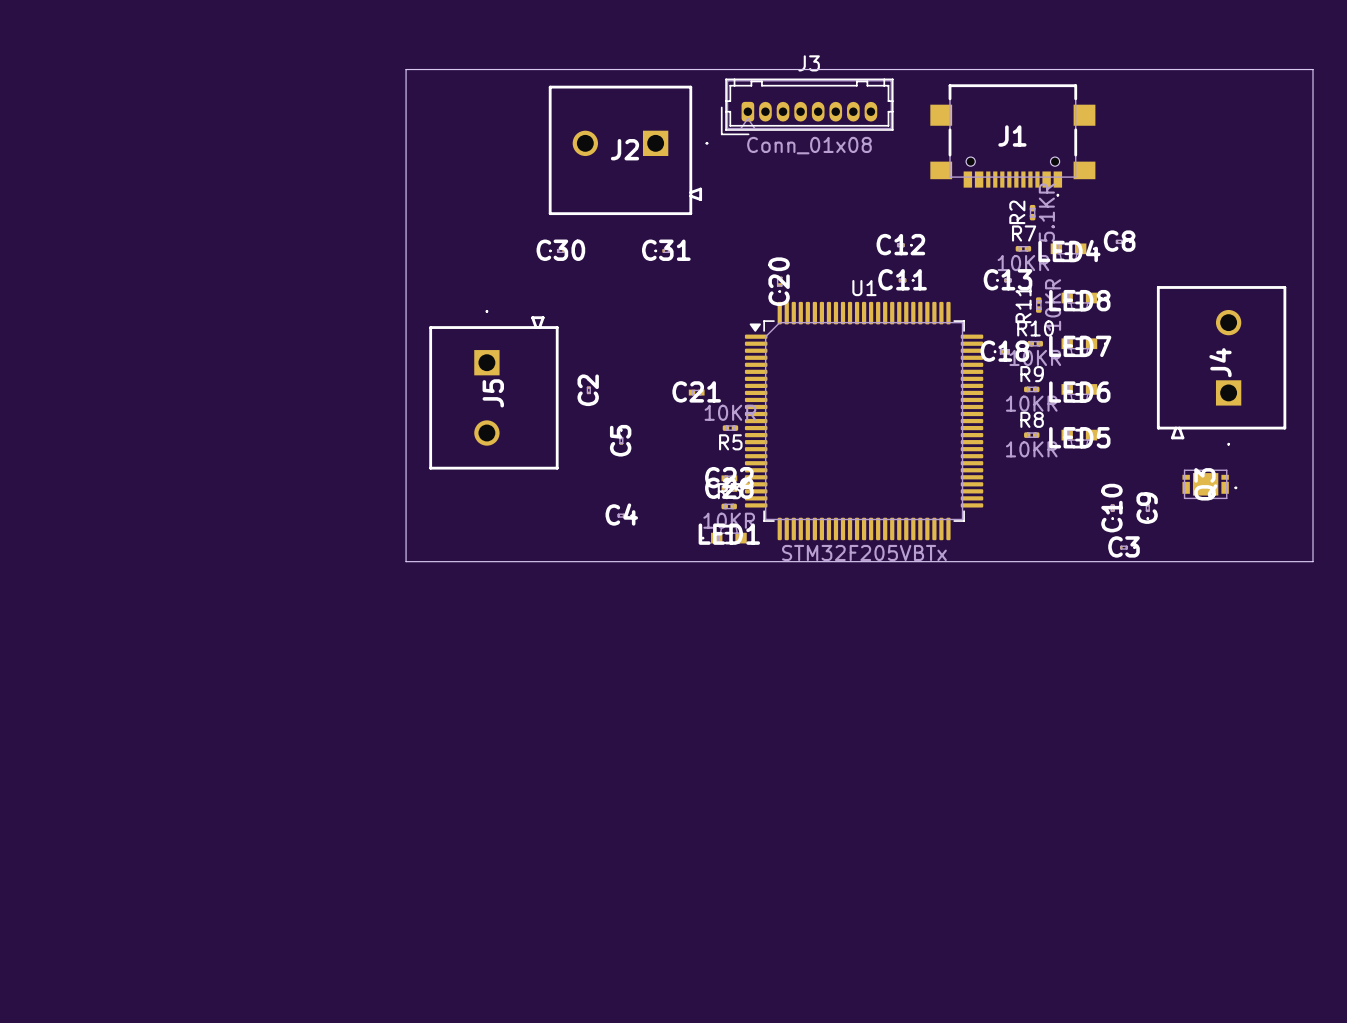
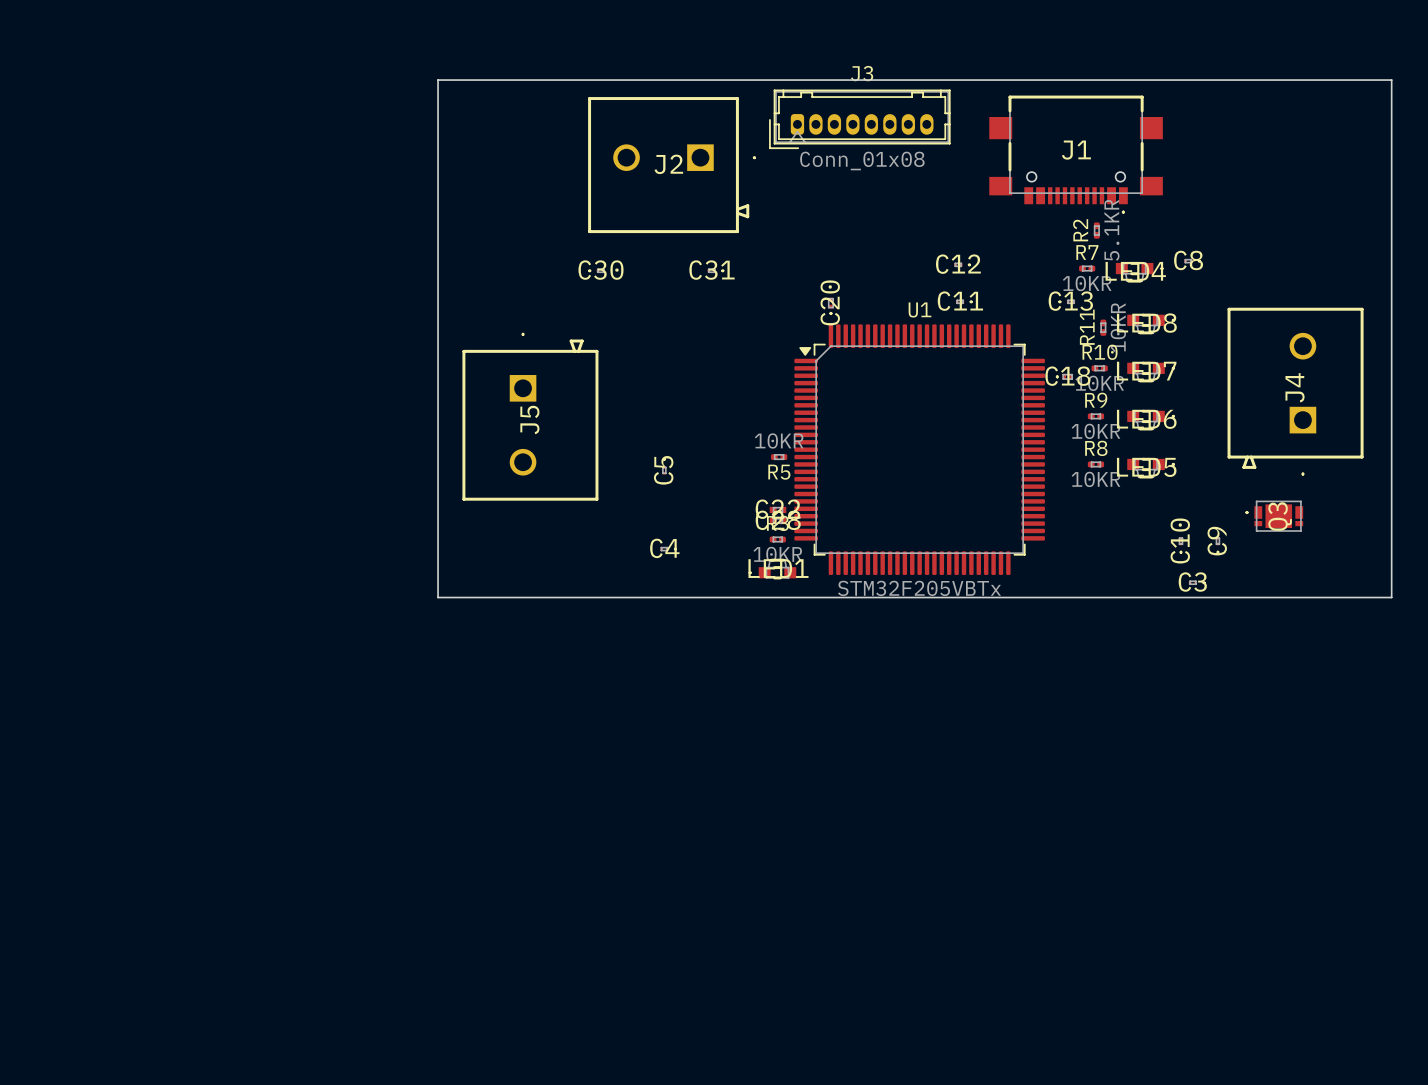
C31 rotation: 0° (662, 250) -> 180° (715, 270)
C2: (588, 386) -> none
C21: (696, 392) -> none
Q3 rotation: 0° (1209, 484) -> 180° (1274, 516)

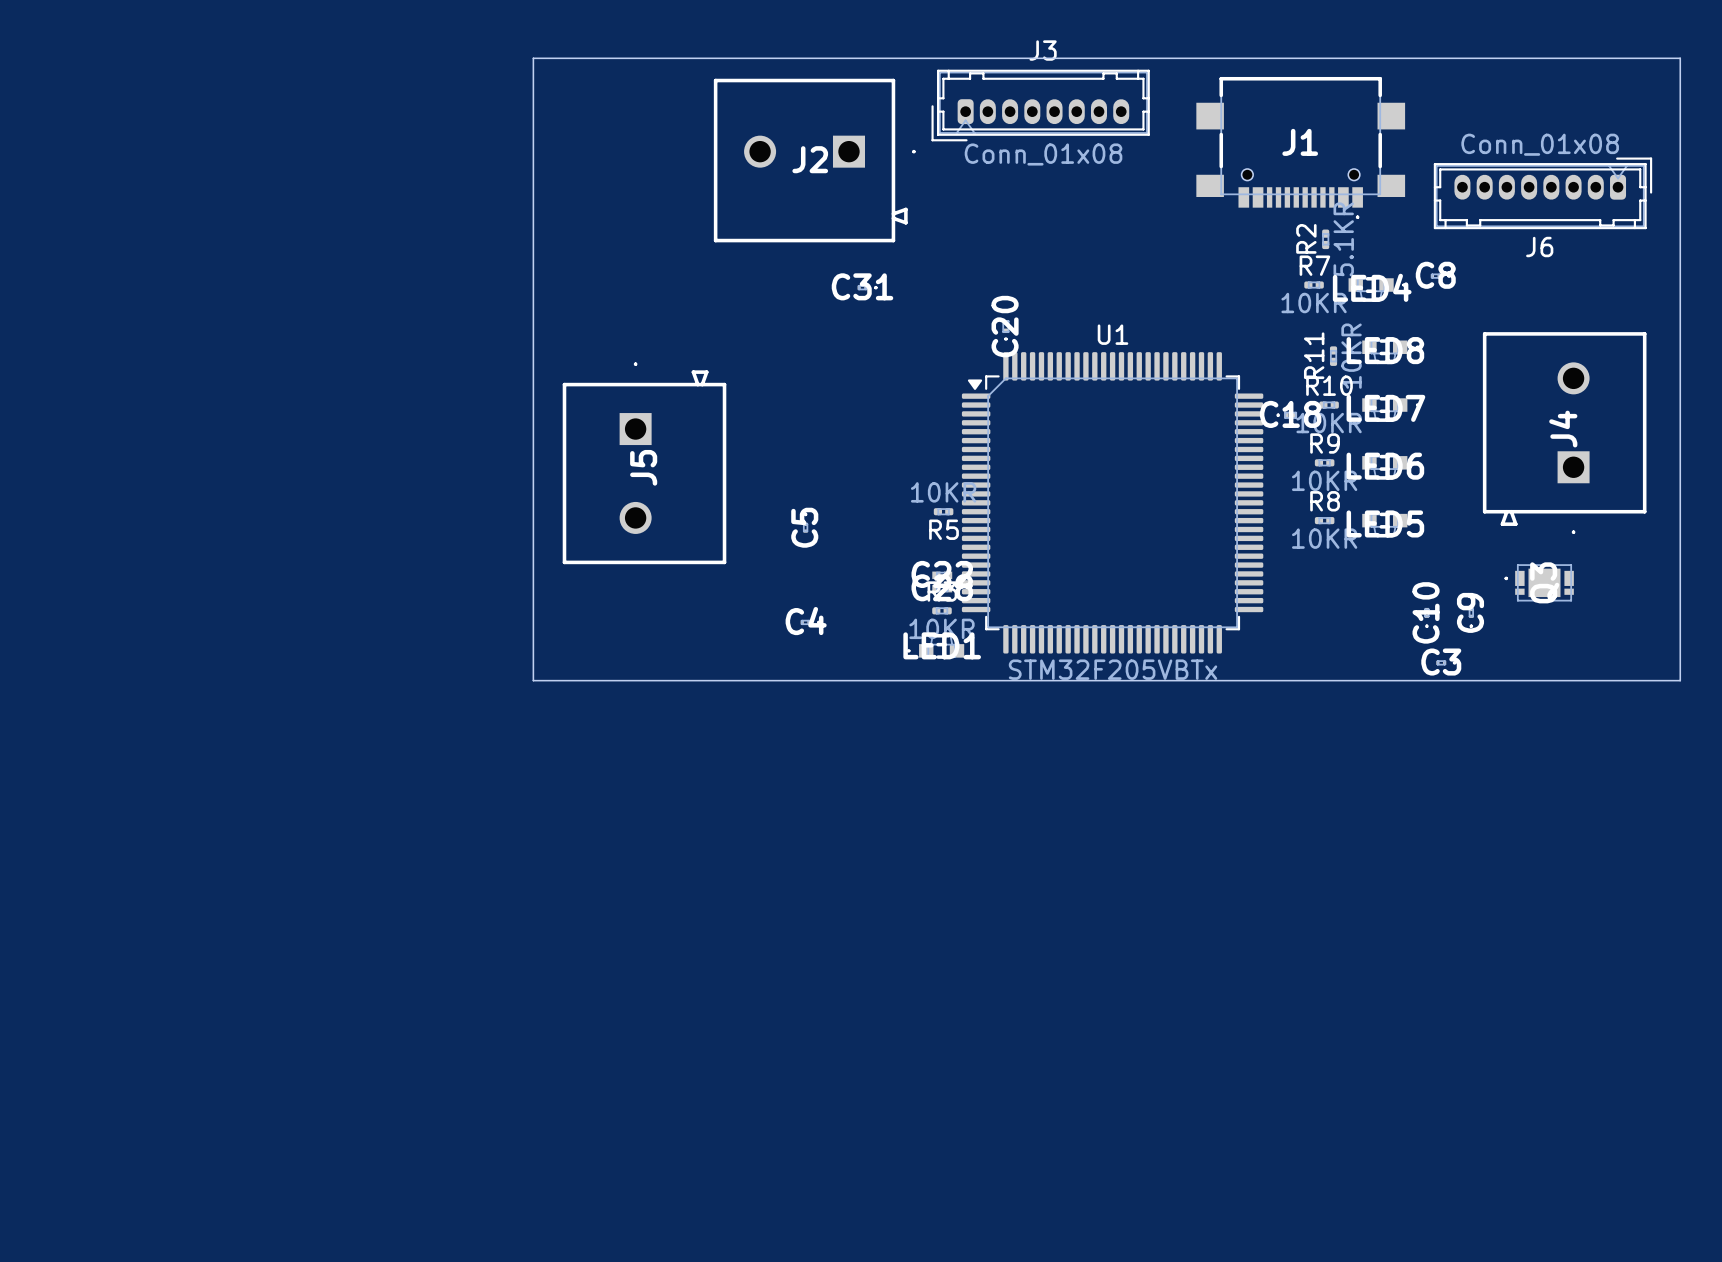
J6: none -> Conn_01x08 (1542, 193)
C12: (962, 264) -> none
C30: (596, 270) -> none
C11: (964, 301) -> none
C13: (1066, 301) -> none

